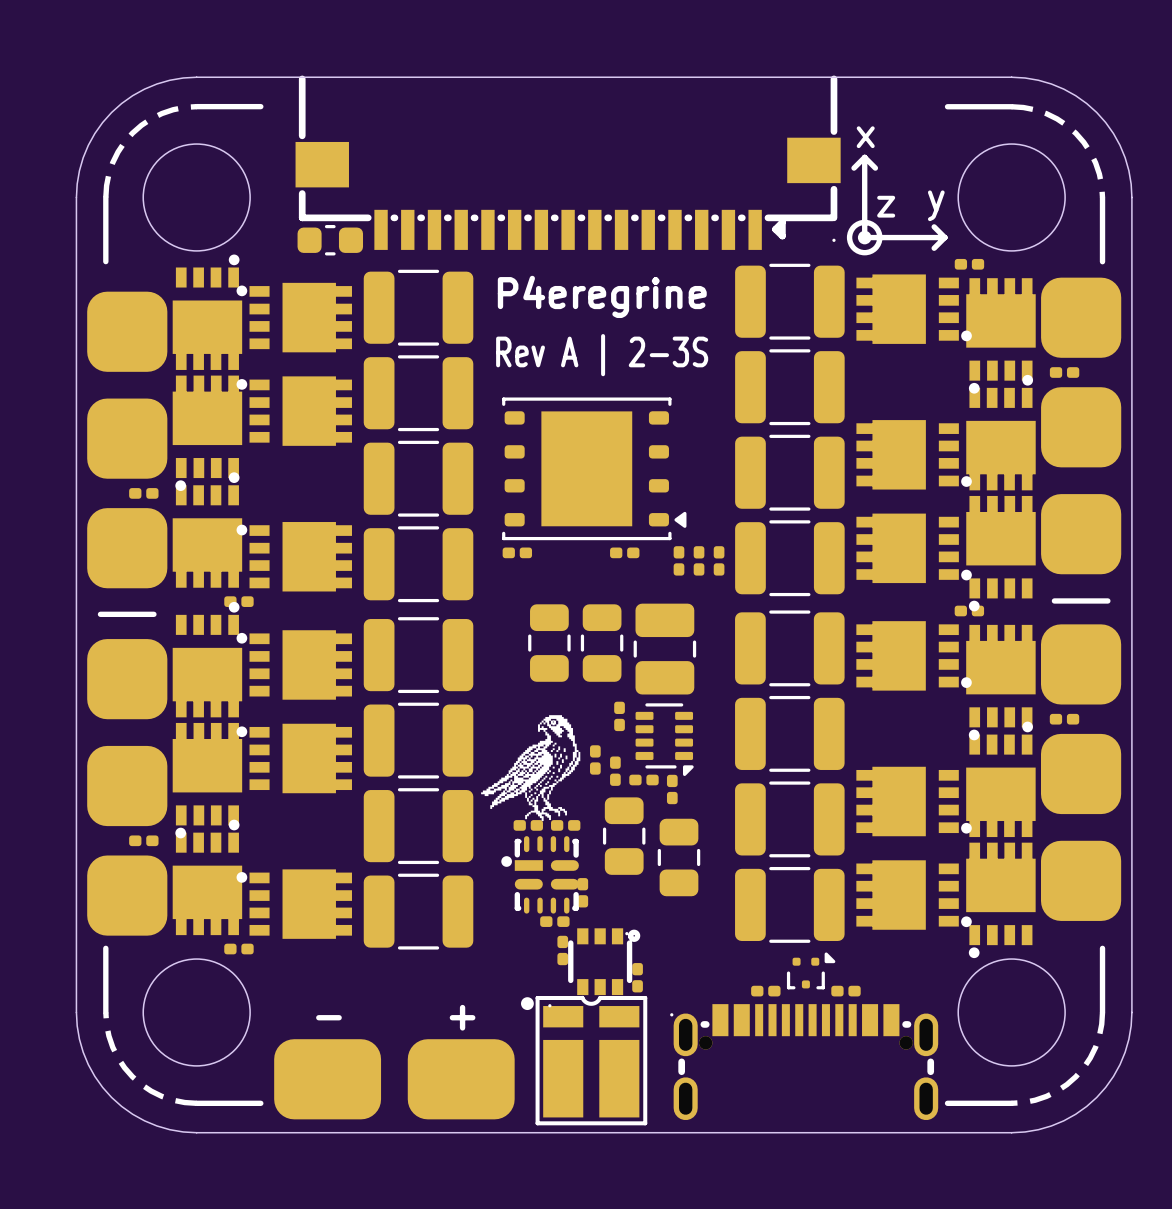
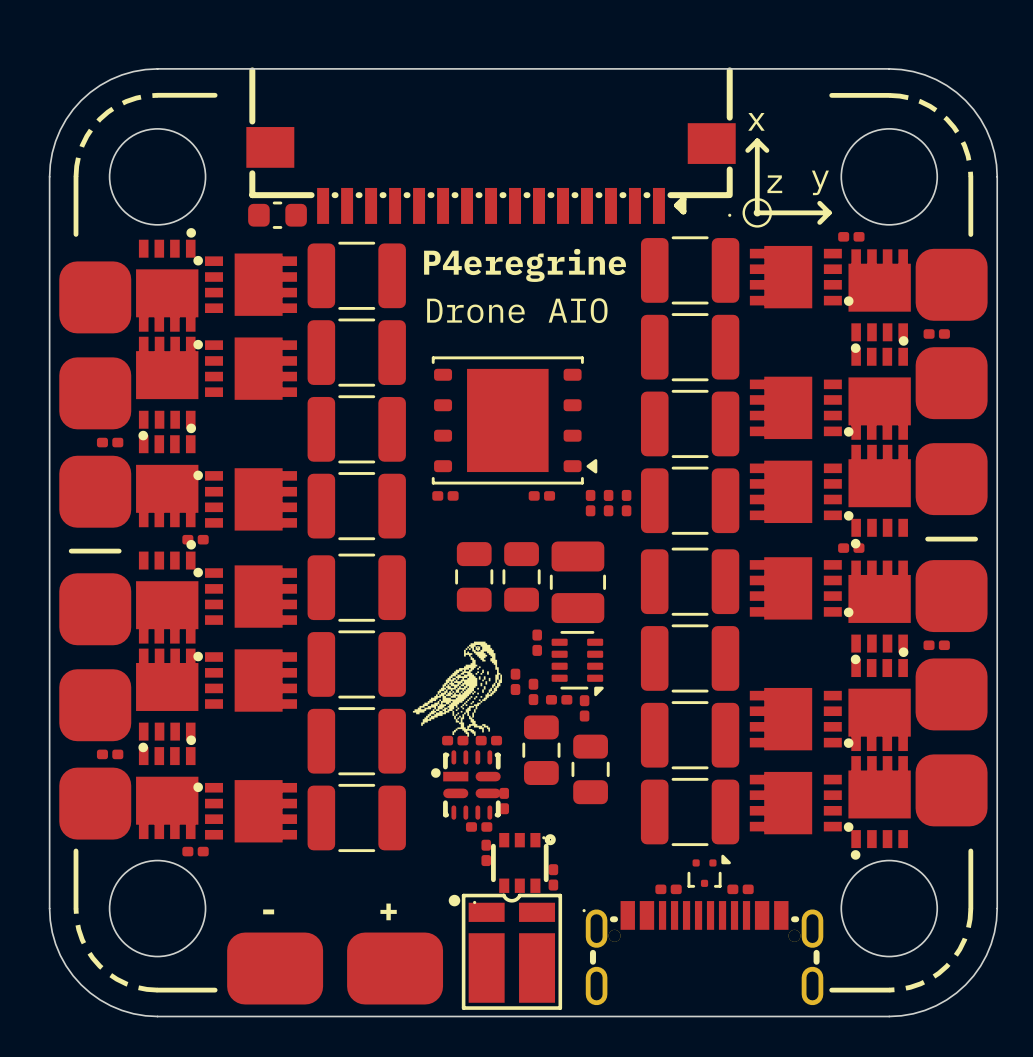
drawing: [846, 219, 883, 256] -> none
drawing: none -> [742, 198, 773, 228]
text: Rev A | 2-3S (602, 355) -> Drone AIO (517, 310)

